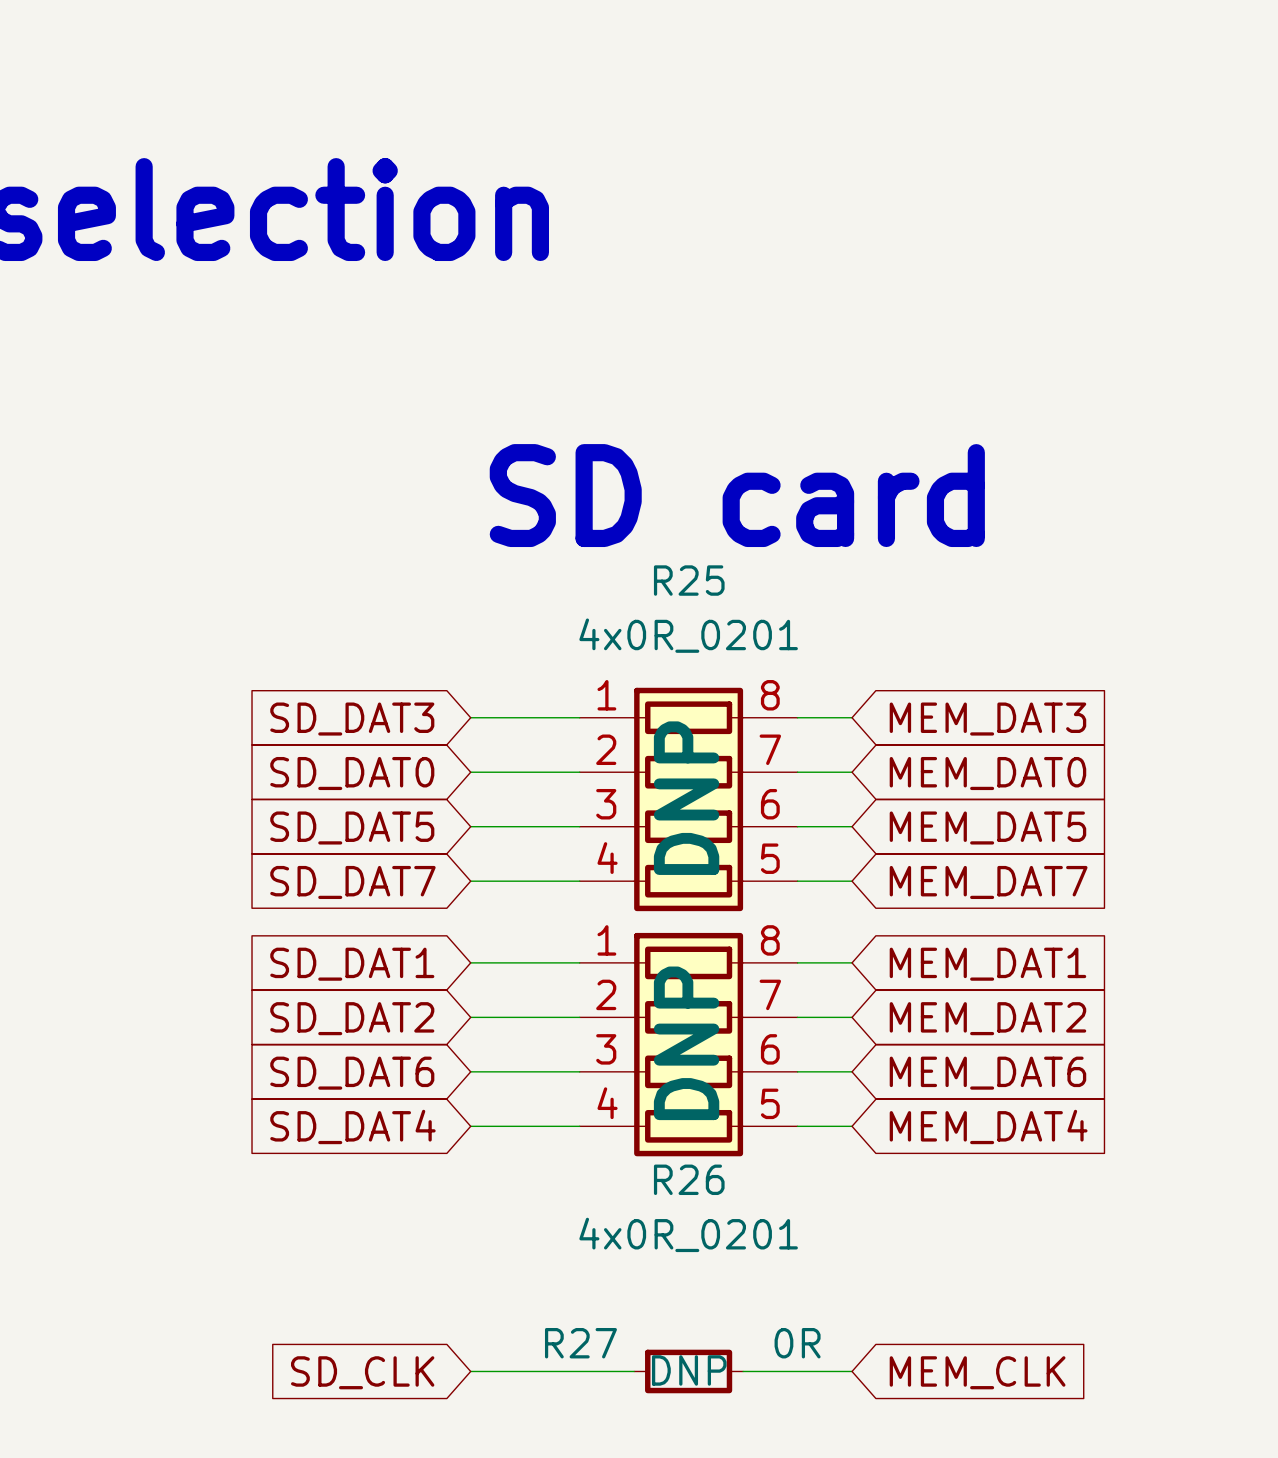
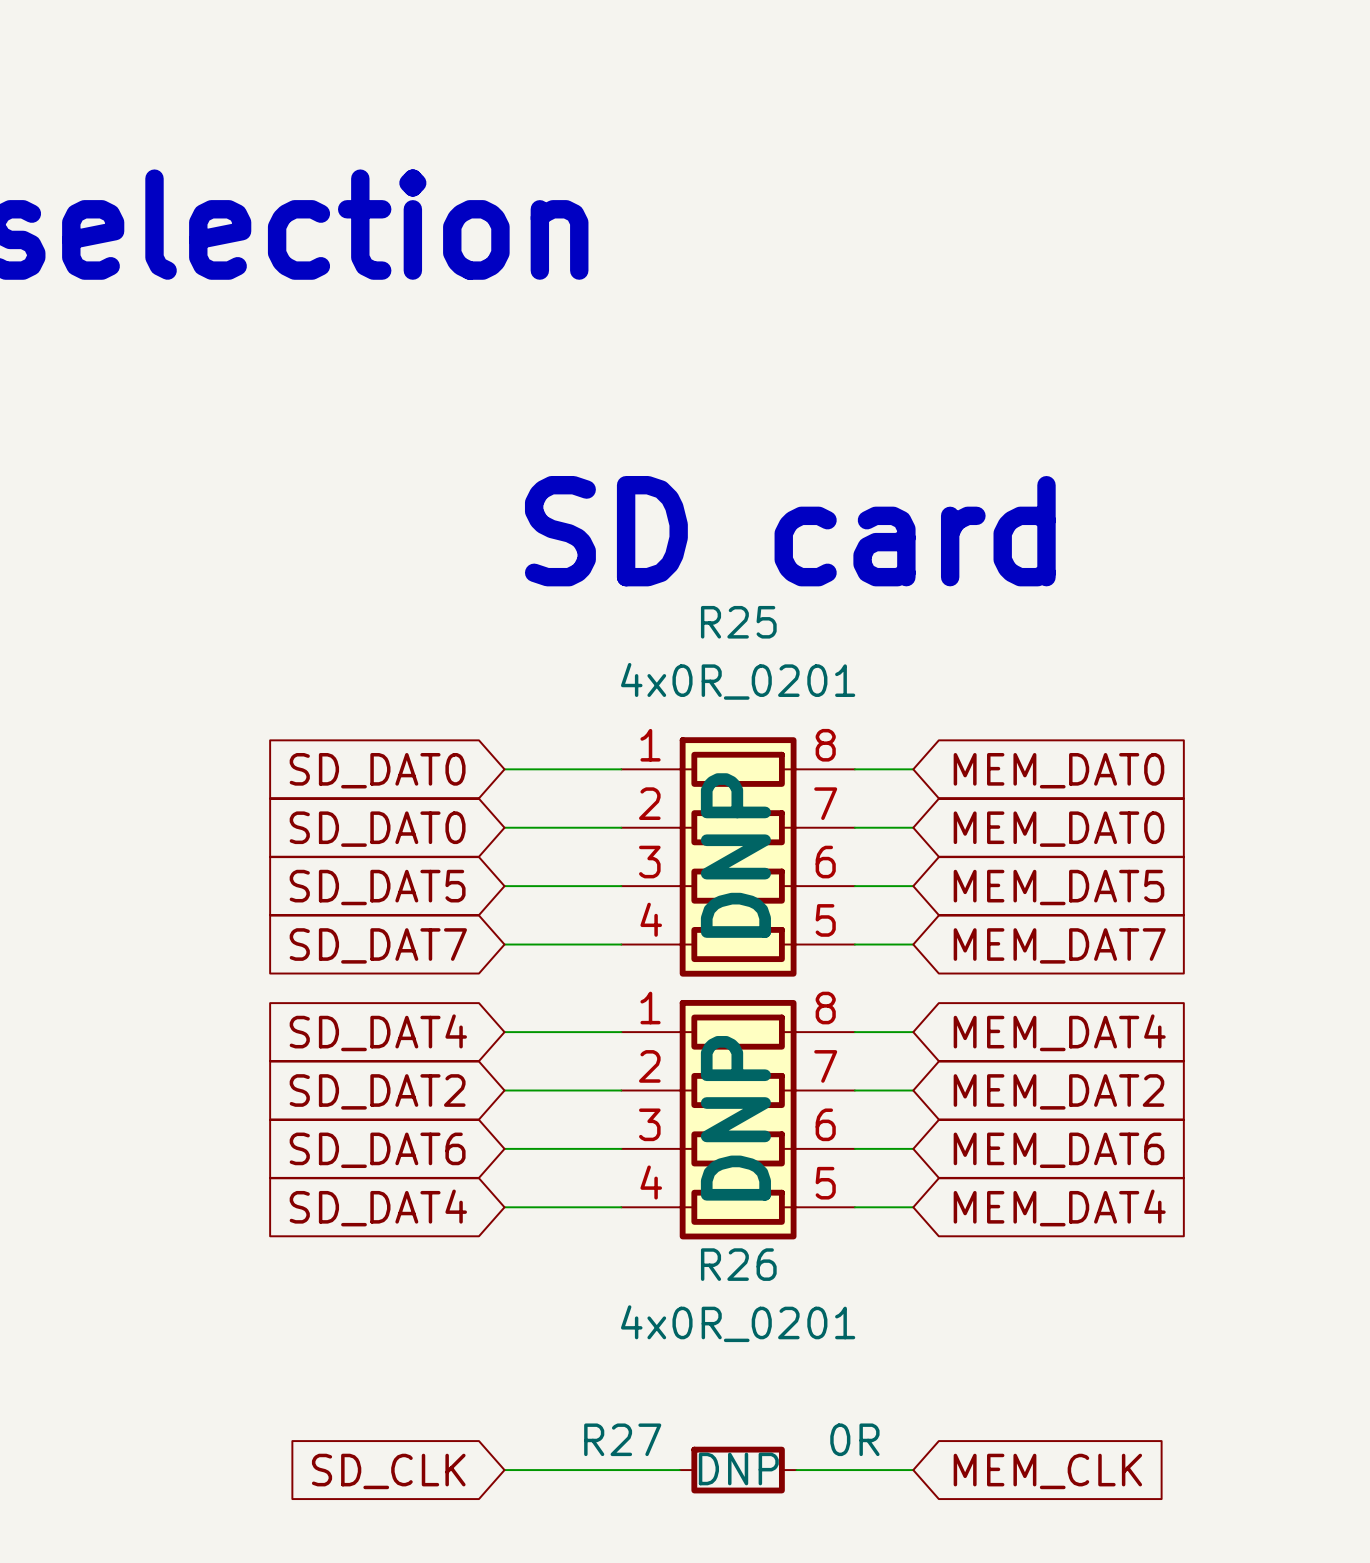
global label: SD_DAT3 (352, 719) -> SD_DAT0 (377, 770)
global label: MEM_DAT3 (987, 719) -> MEM_DAT0 (1058, 770)
global label: SD_DAT1 (352, 964) -> SD_DAT4 (378, 1032)
global label: MEM_DAT1 (987, 964) -> MEM_DAT4 (1059, 1032)

